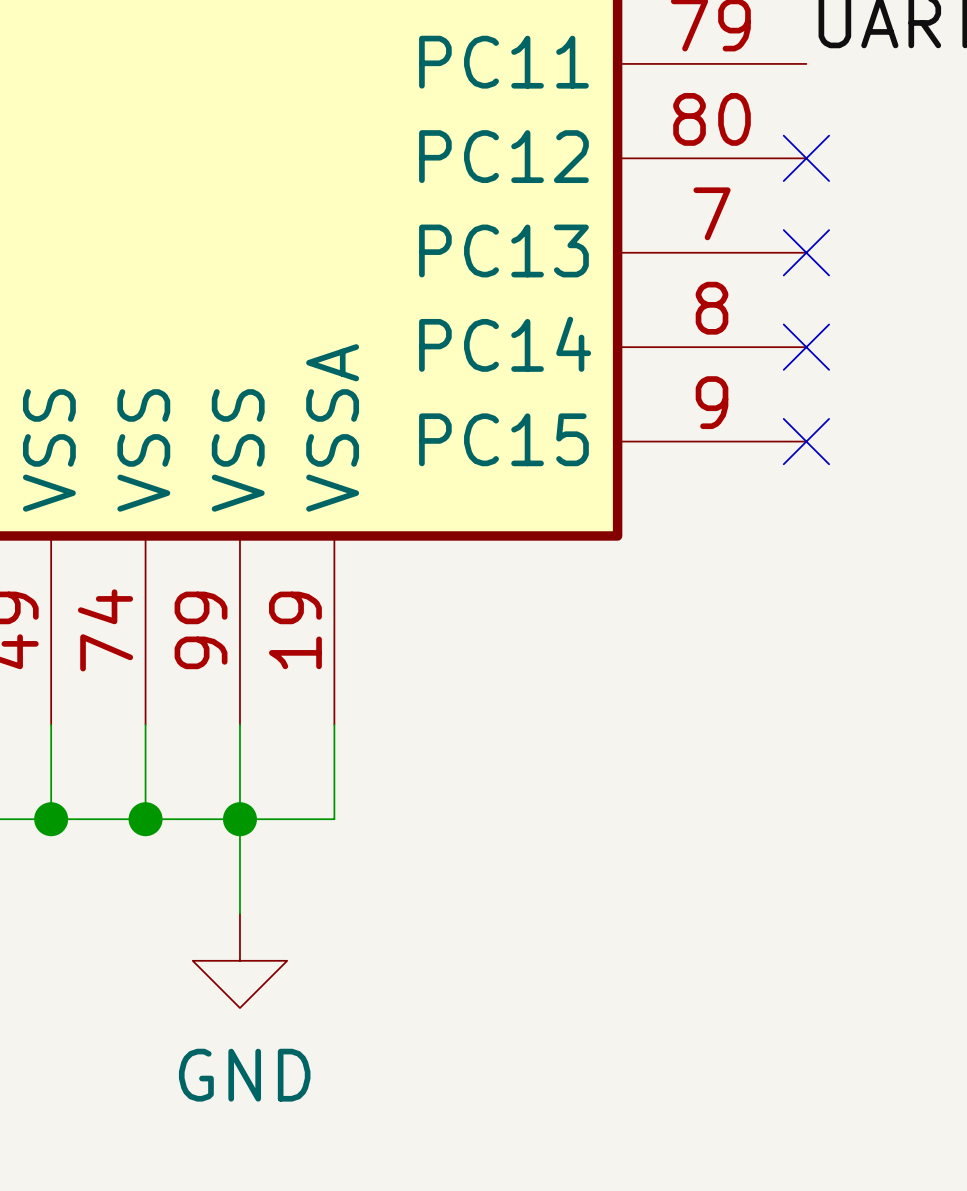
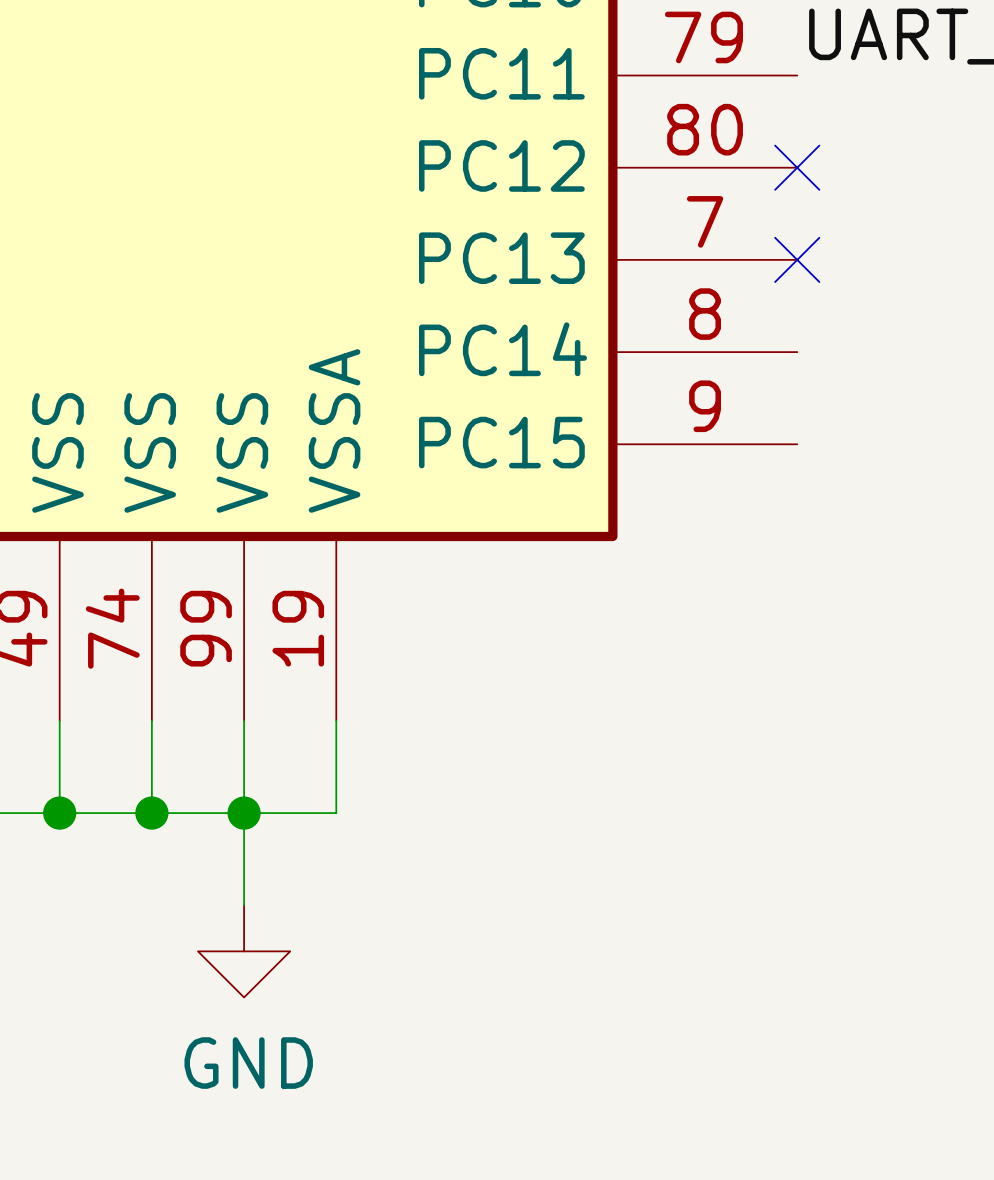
no-connect mark: (806, 347) -> none
no-connect mark: (806, 441) -> none

